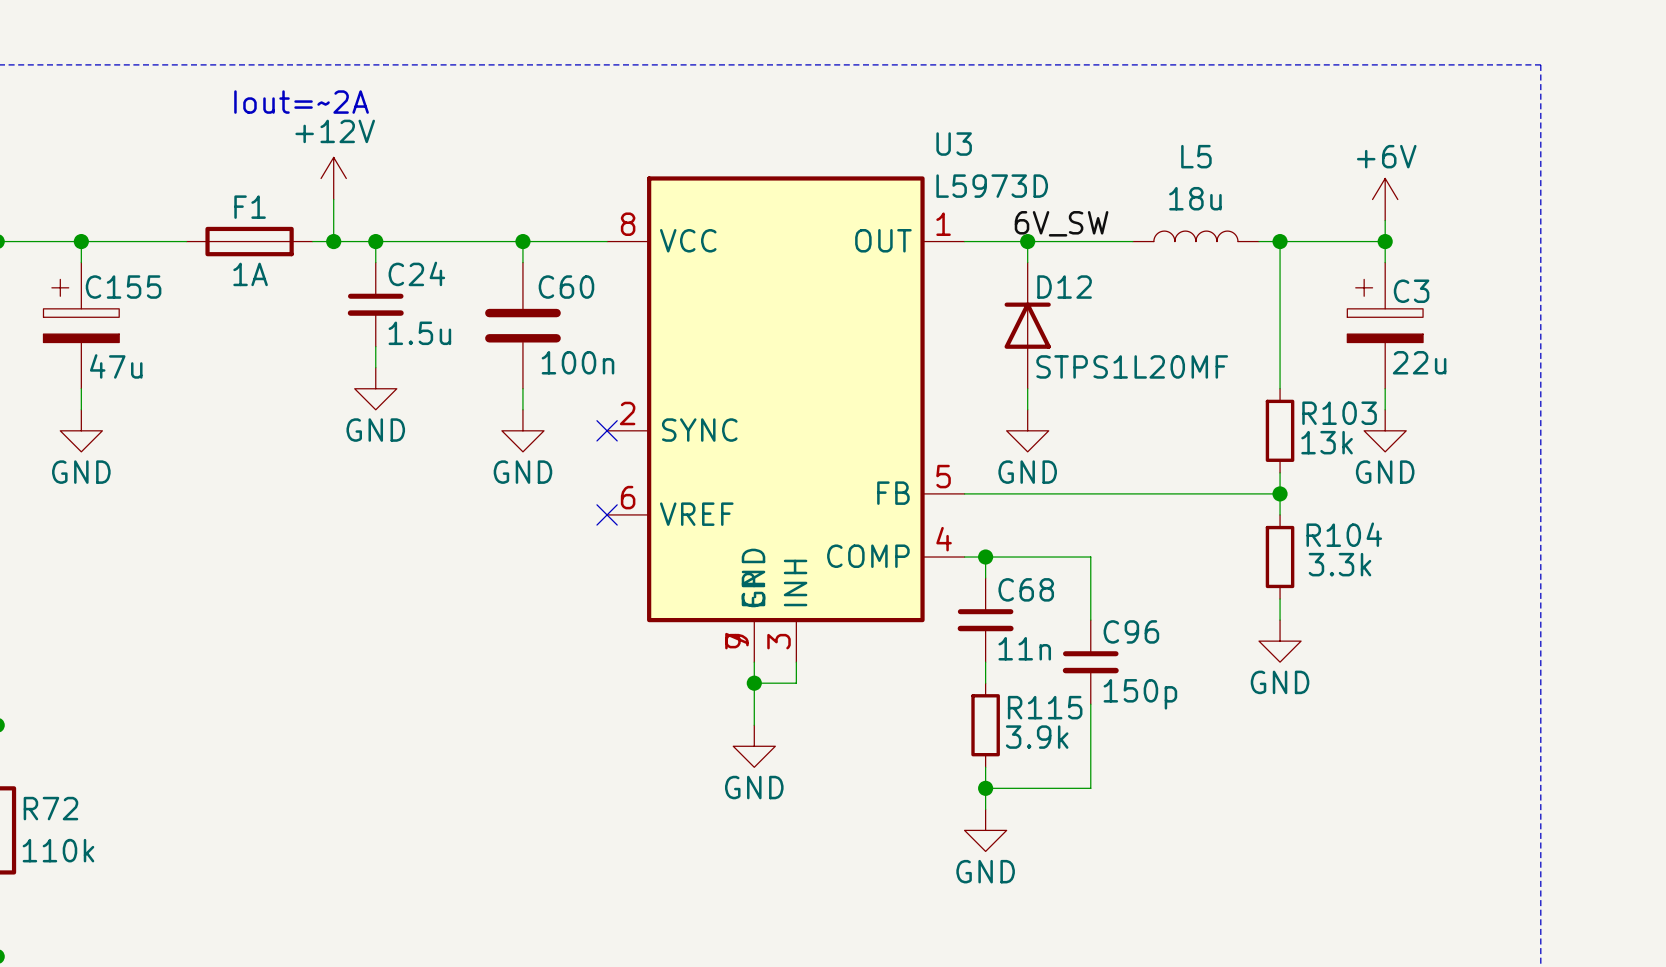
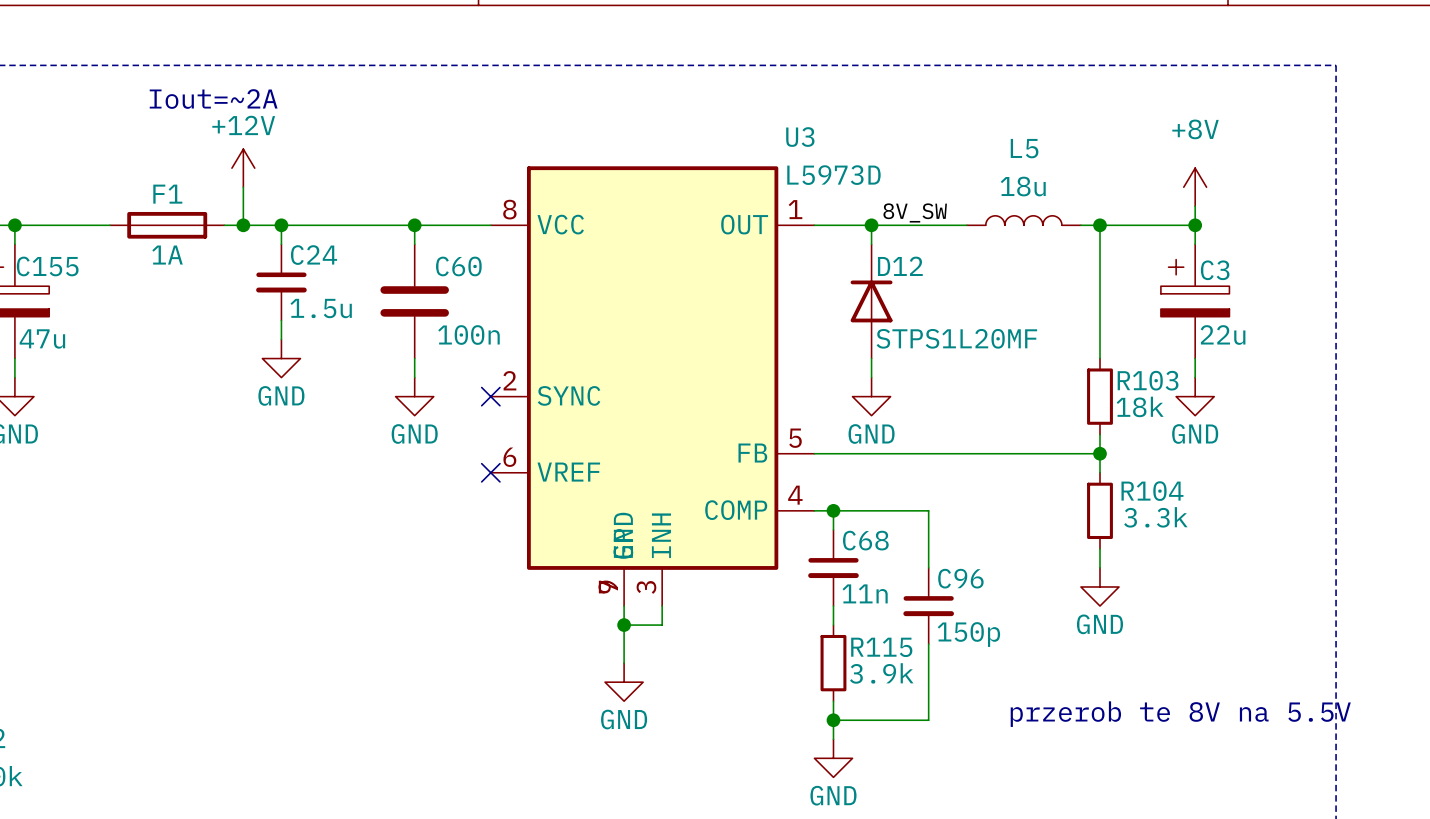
power symbol: +6V (1385, 199) -> +8V (1195, 187)
label: 6V_SW (1061, 223) -> 8V_SW (915, 212)
R103 value: 13k (1327, 442) -> 18k (1140, 406)
text: none -> przerob te 8V na 5.5V (1180, 714)

